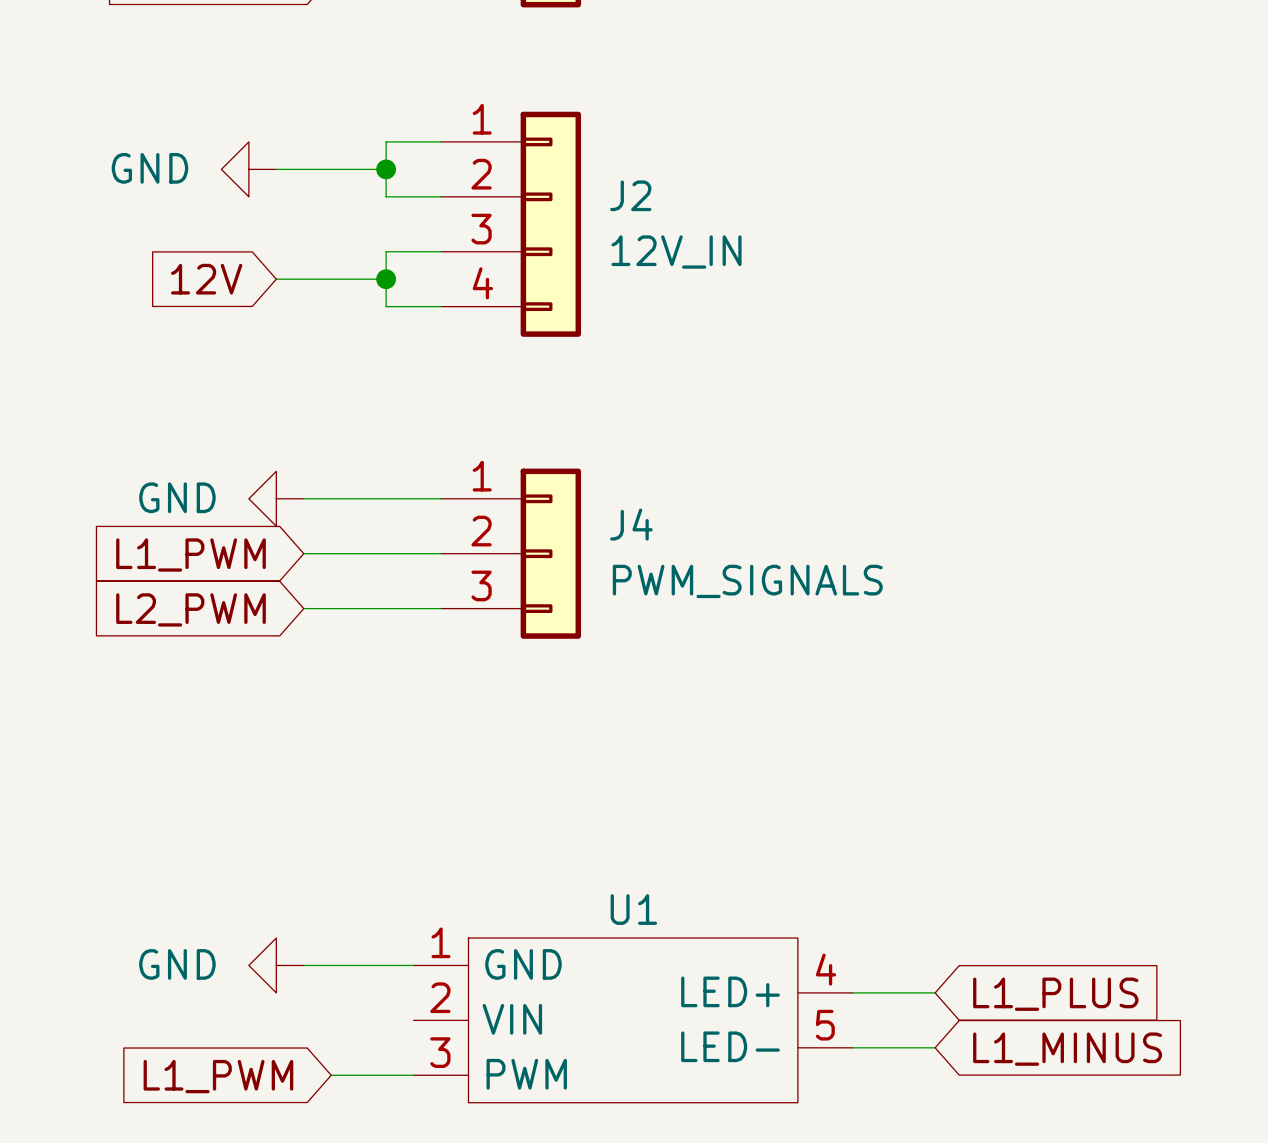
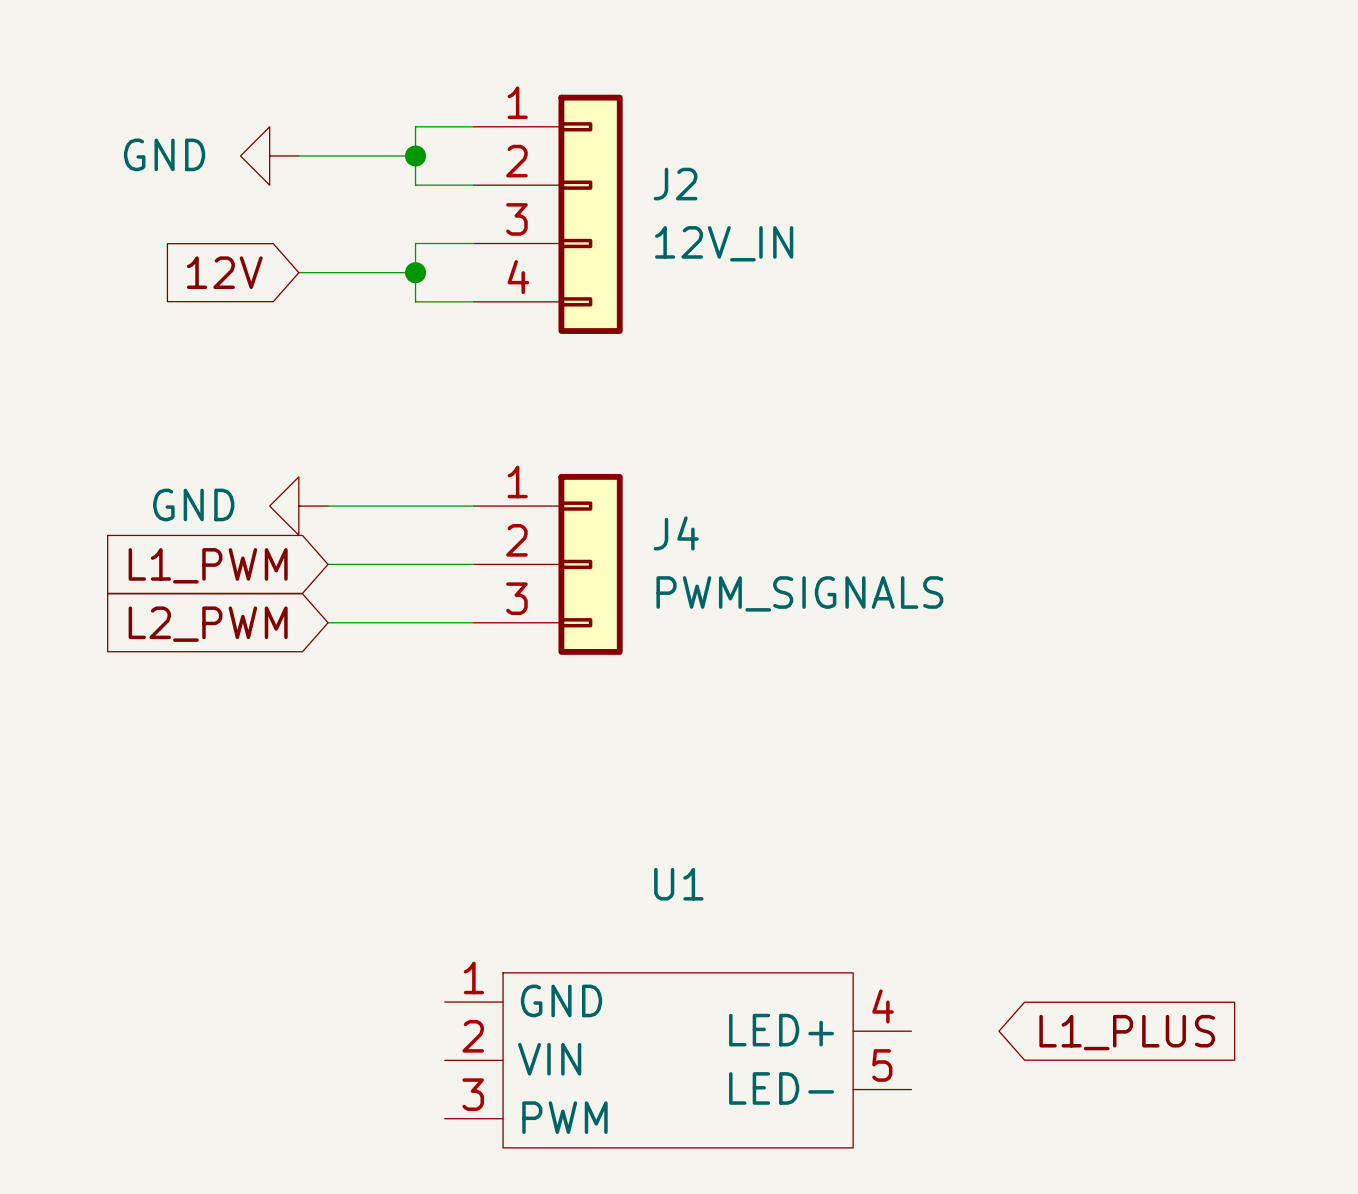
U1 name position: U1 (633, 909) -> U1 (678, 884)
power symbol: GND (276, 965) -> none
wire: (303, 965) (413, 965) -> none
wire: (852, 992) (935, 992) -> none
wire: (852, 1047) (935, 1047) -> none
global label: L1_MINUS (1067, 1049) -> none
wire: (331, 1075) (413, 1075) -> none
global label: L1_PWM (218, 1076) -> none

